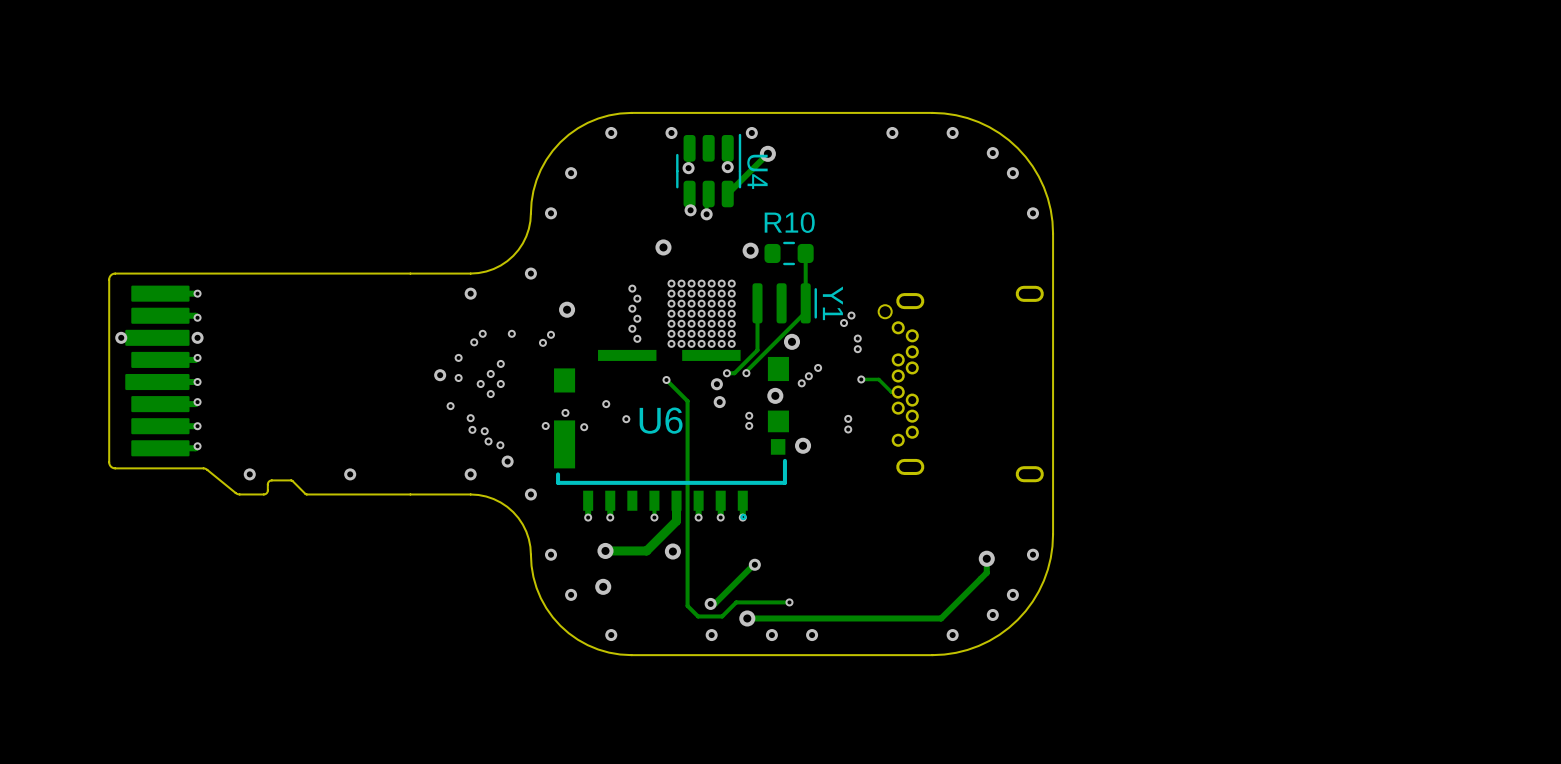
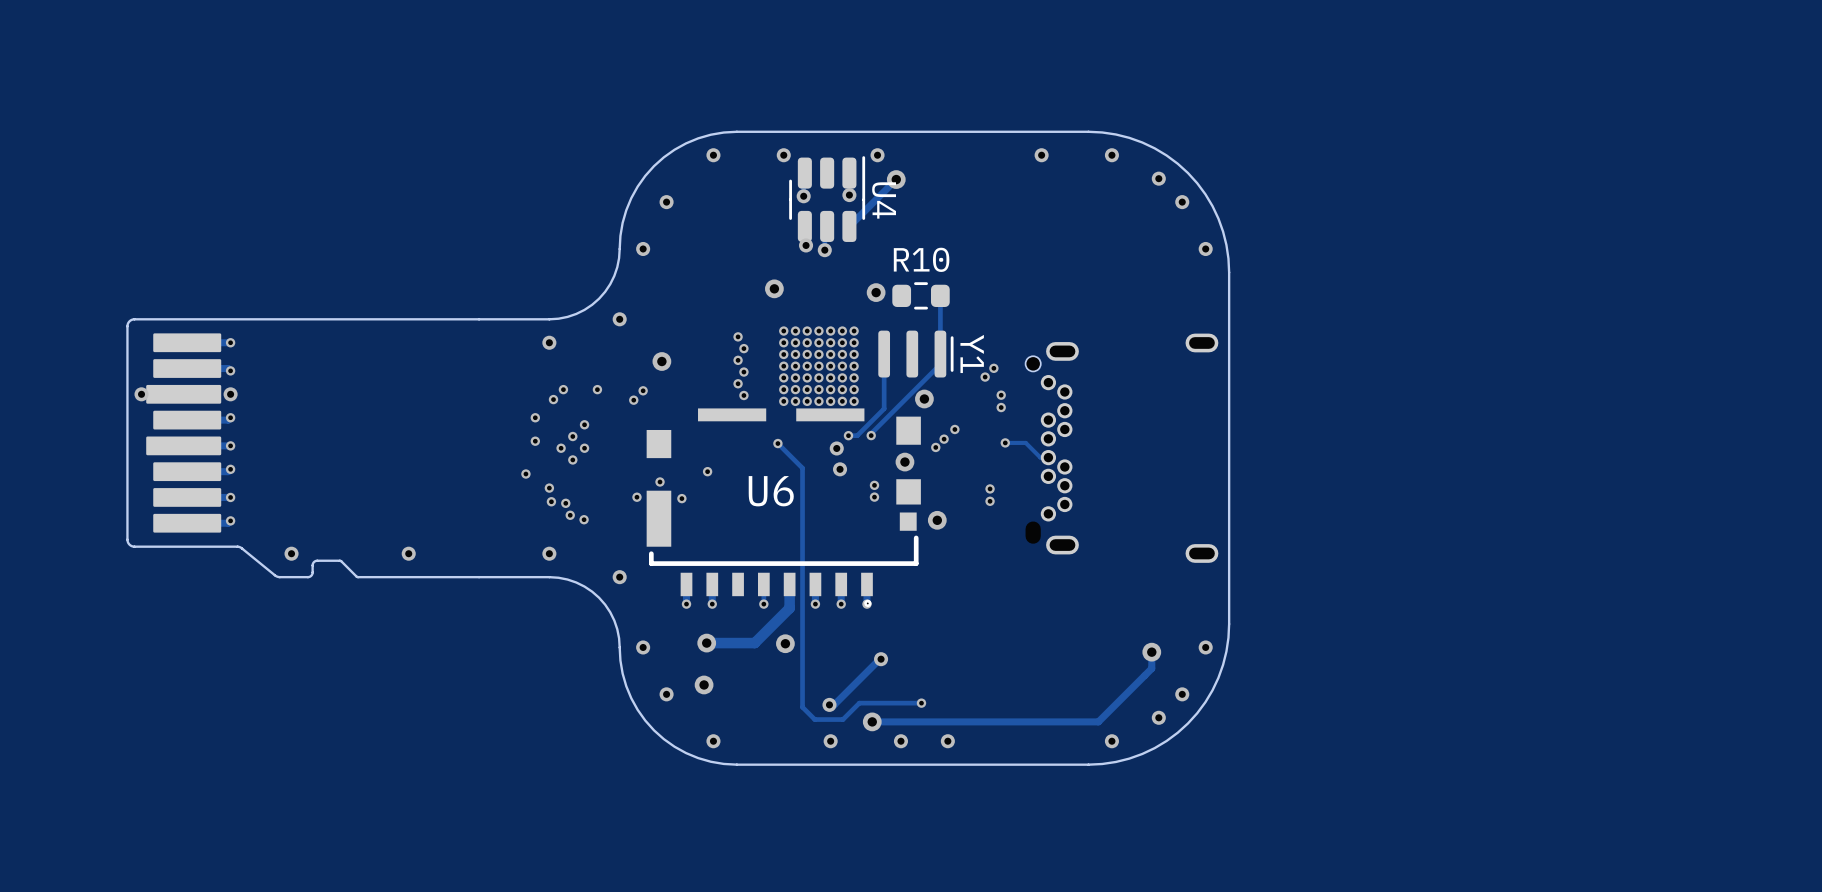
via: (440, 375) -> none
via: (626, 419) -> none
via: (507, 461) -> none

